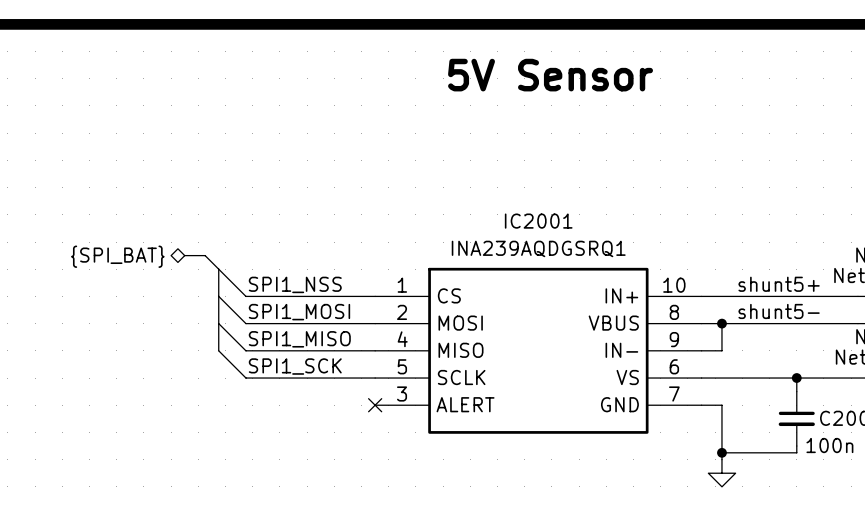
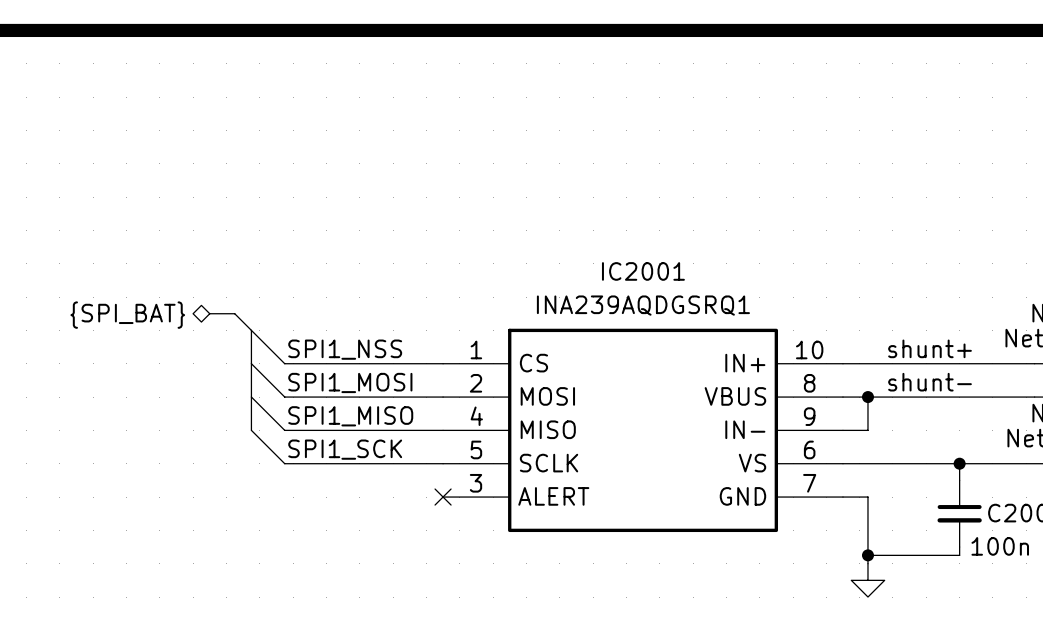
text: 5V Sensor (550, 75) -> none
label: shunt5+ (779, 284) -> shunt+ (930, 348)
label: shunt5- (779, 311) -> shunt- (930, 382)

